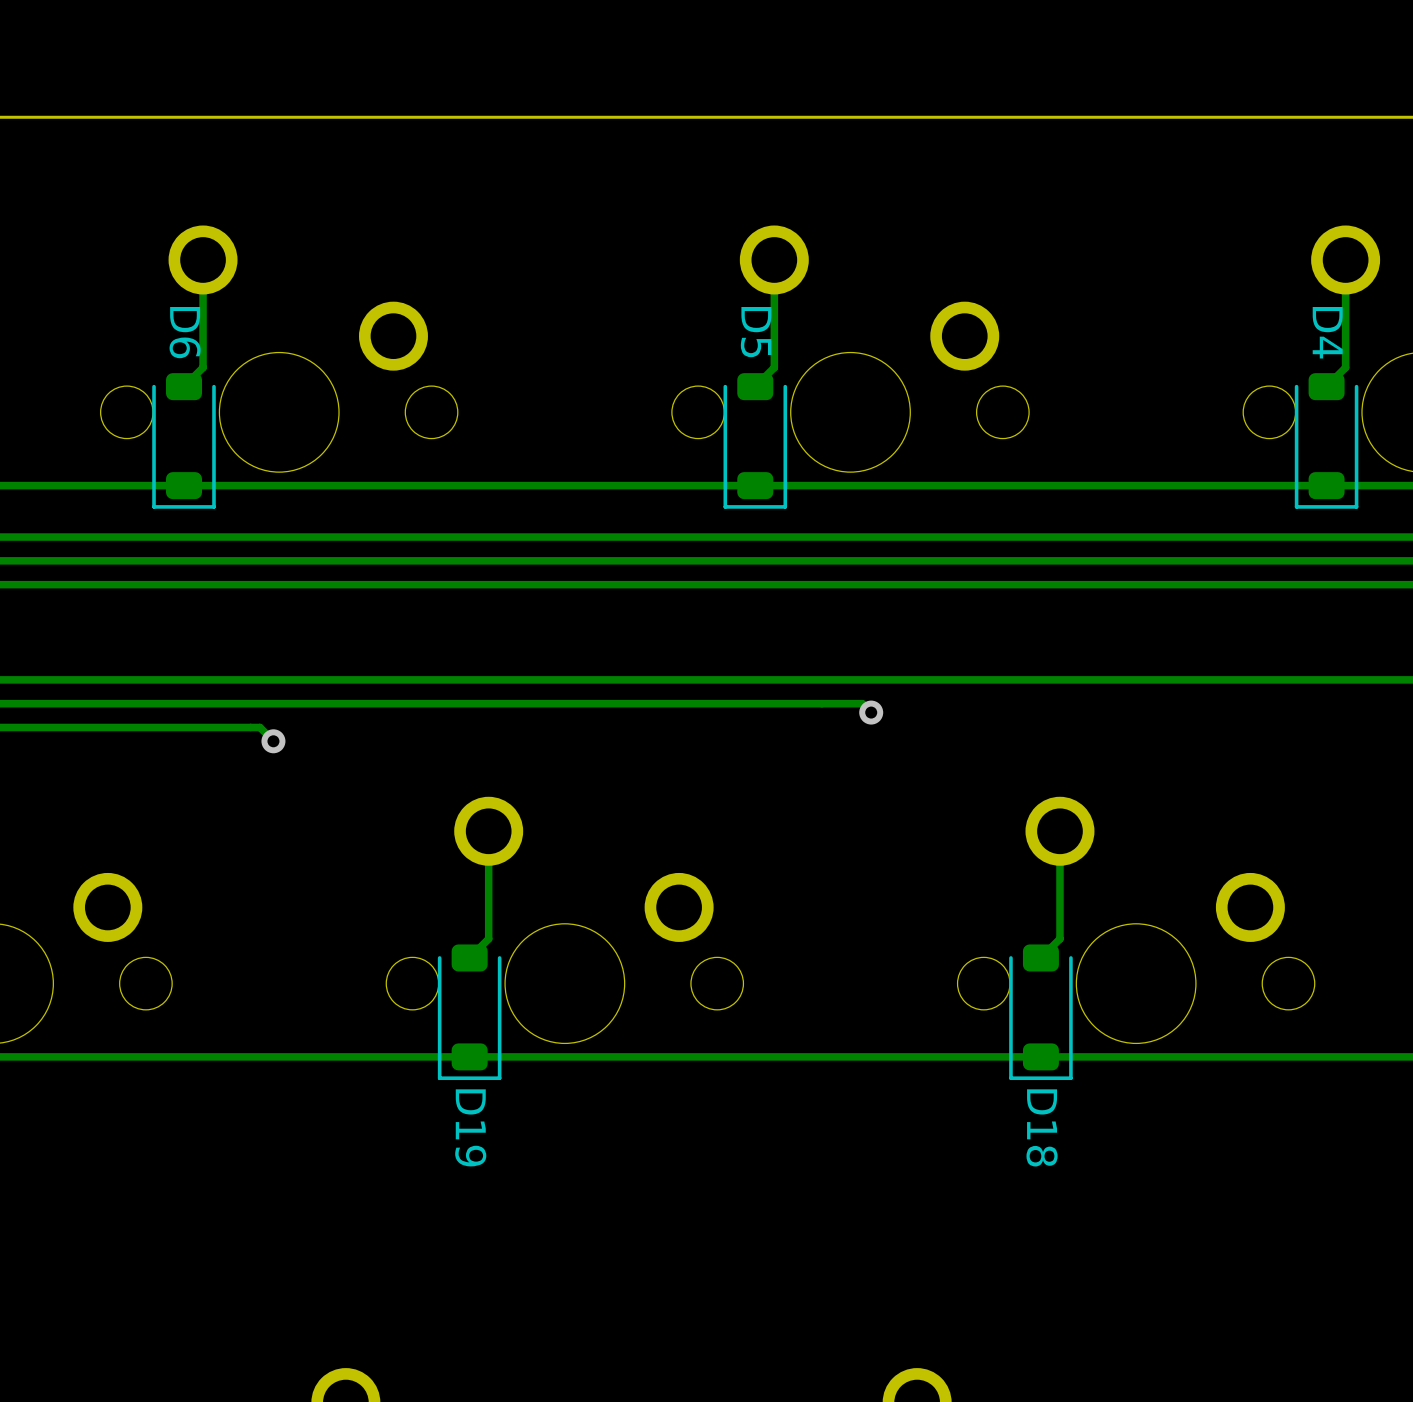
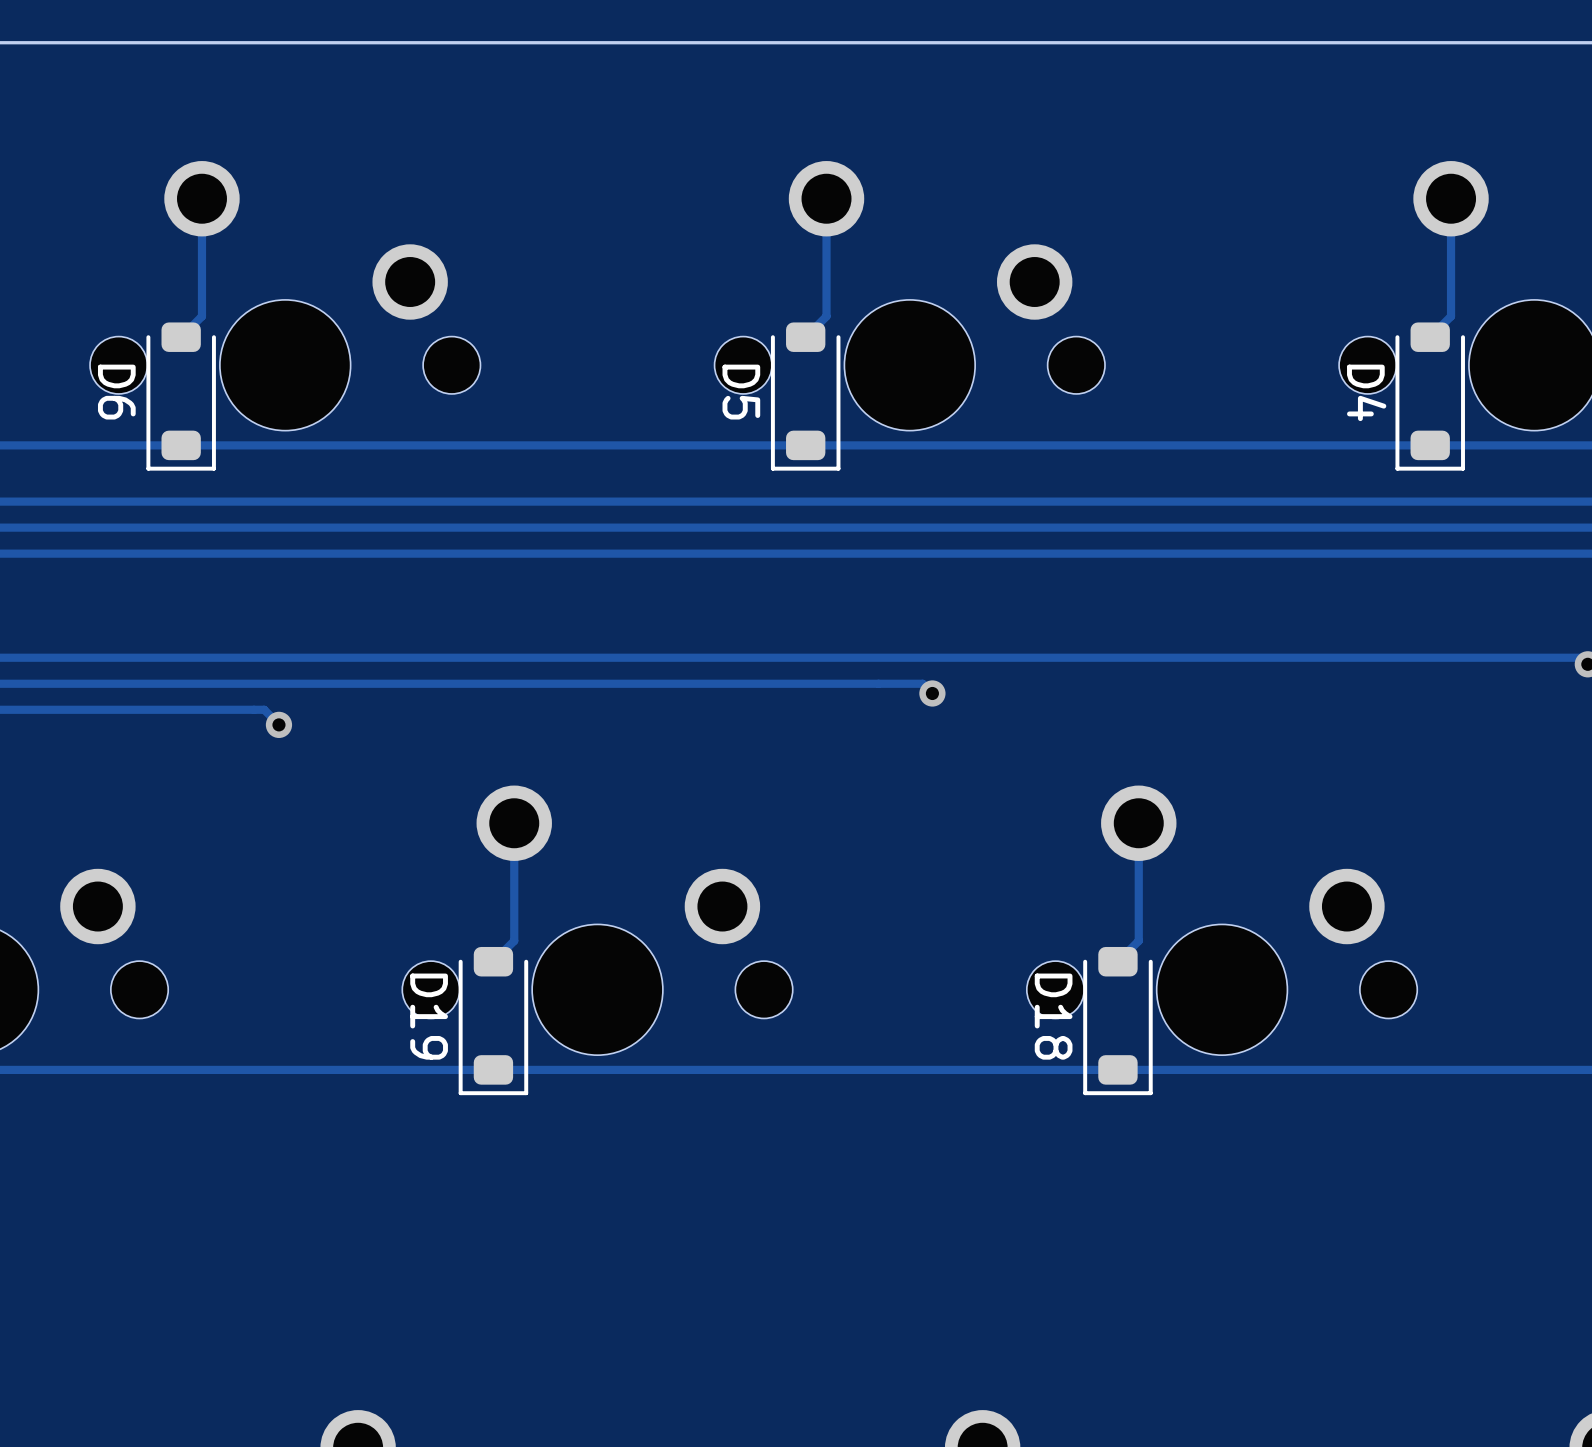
D6 name position: D6 (185, 332) -> D6 (116, 392)
D5 name position: D5 (756, 332) -> D5 (741, 392)
D4 name position: D4 (1327, 332) -> D4 (1366, 392)
D19 name position: D19 (470, 1127) -> D19 (429, 1016)
D18 name position: D18 (1042, 1127) -> D18 (1053, 1016)

